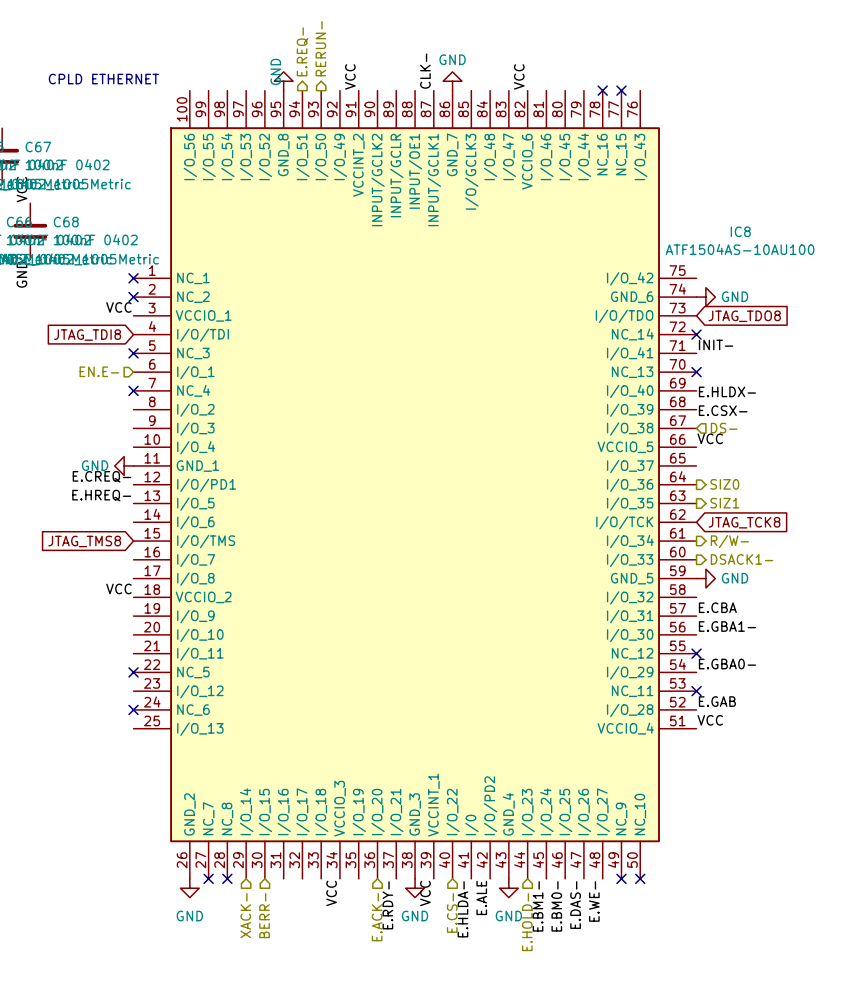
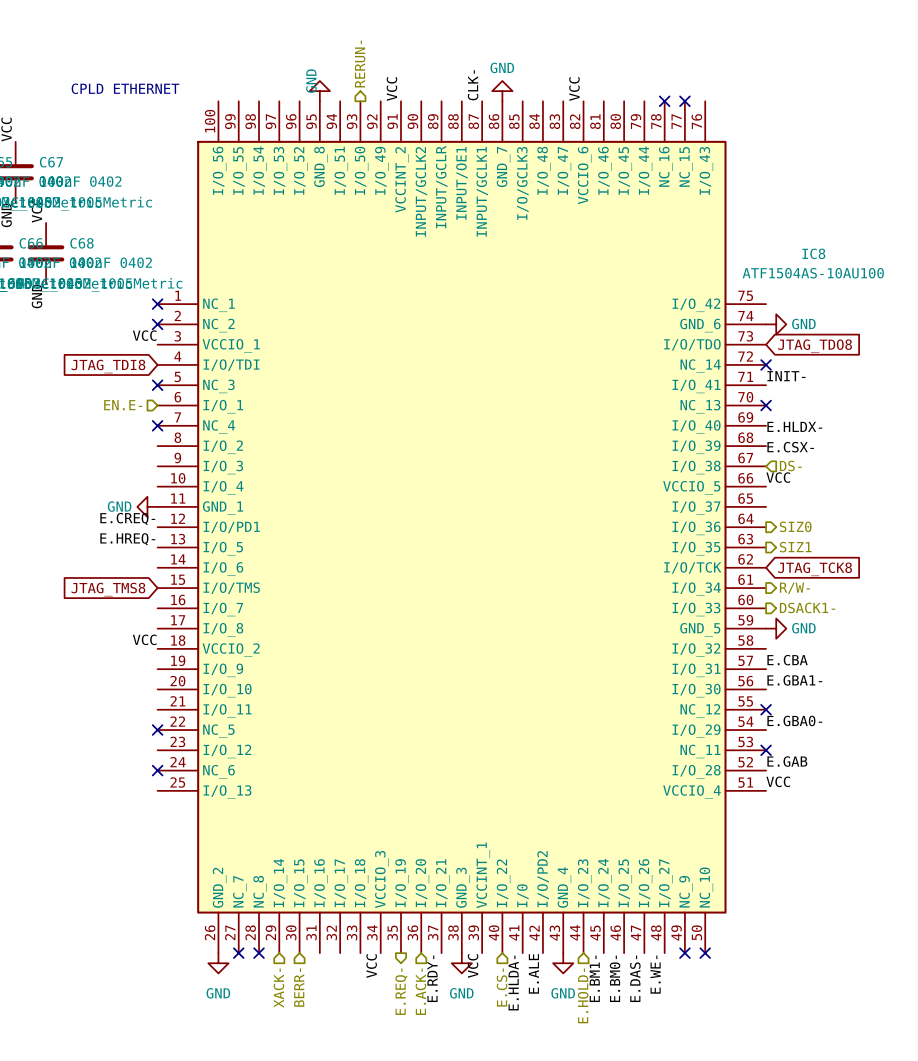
hierarchical label: E.REQ- (302, 51) -> none
hierarchical label: none -> E.REQ- (401, 991)

